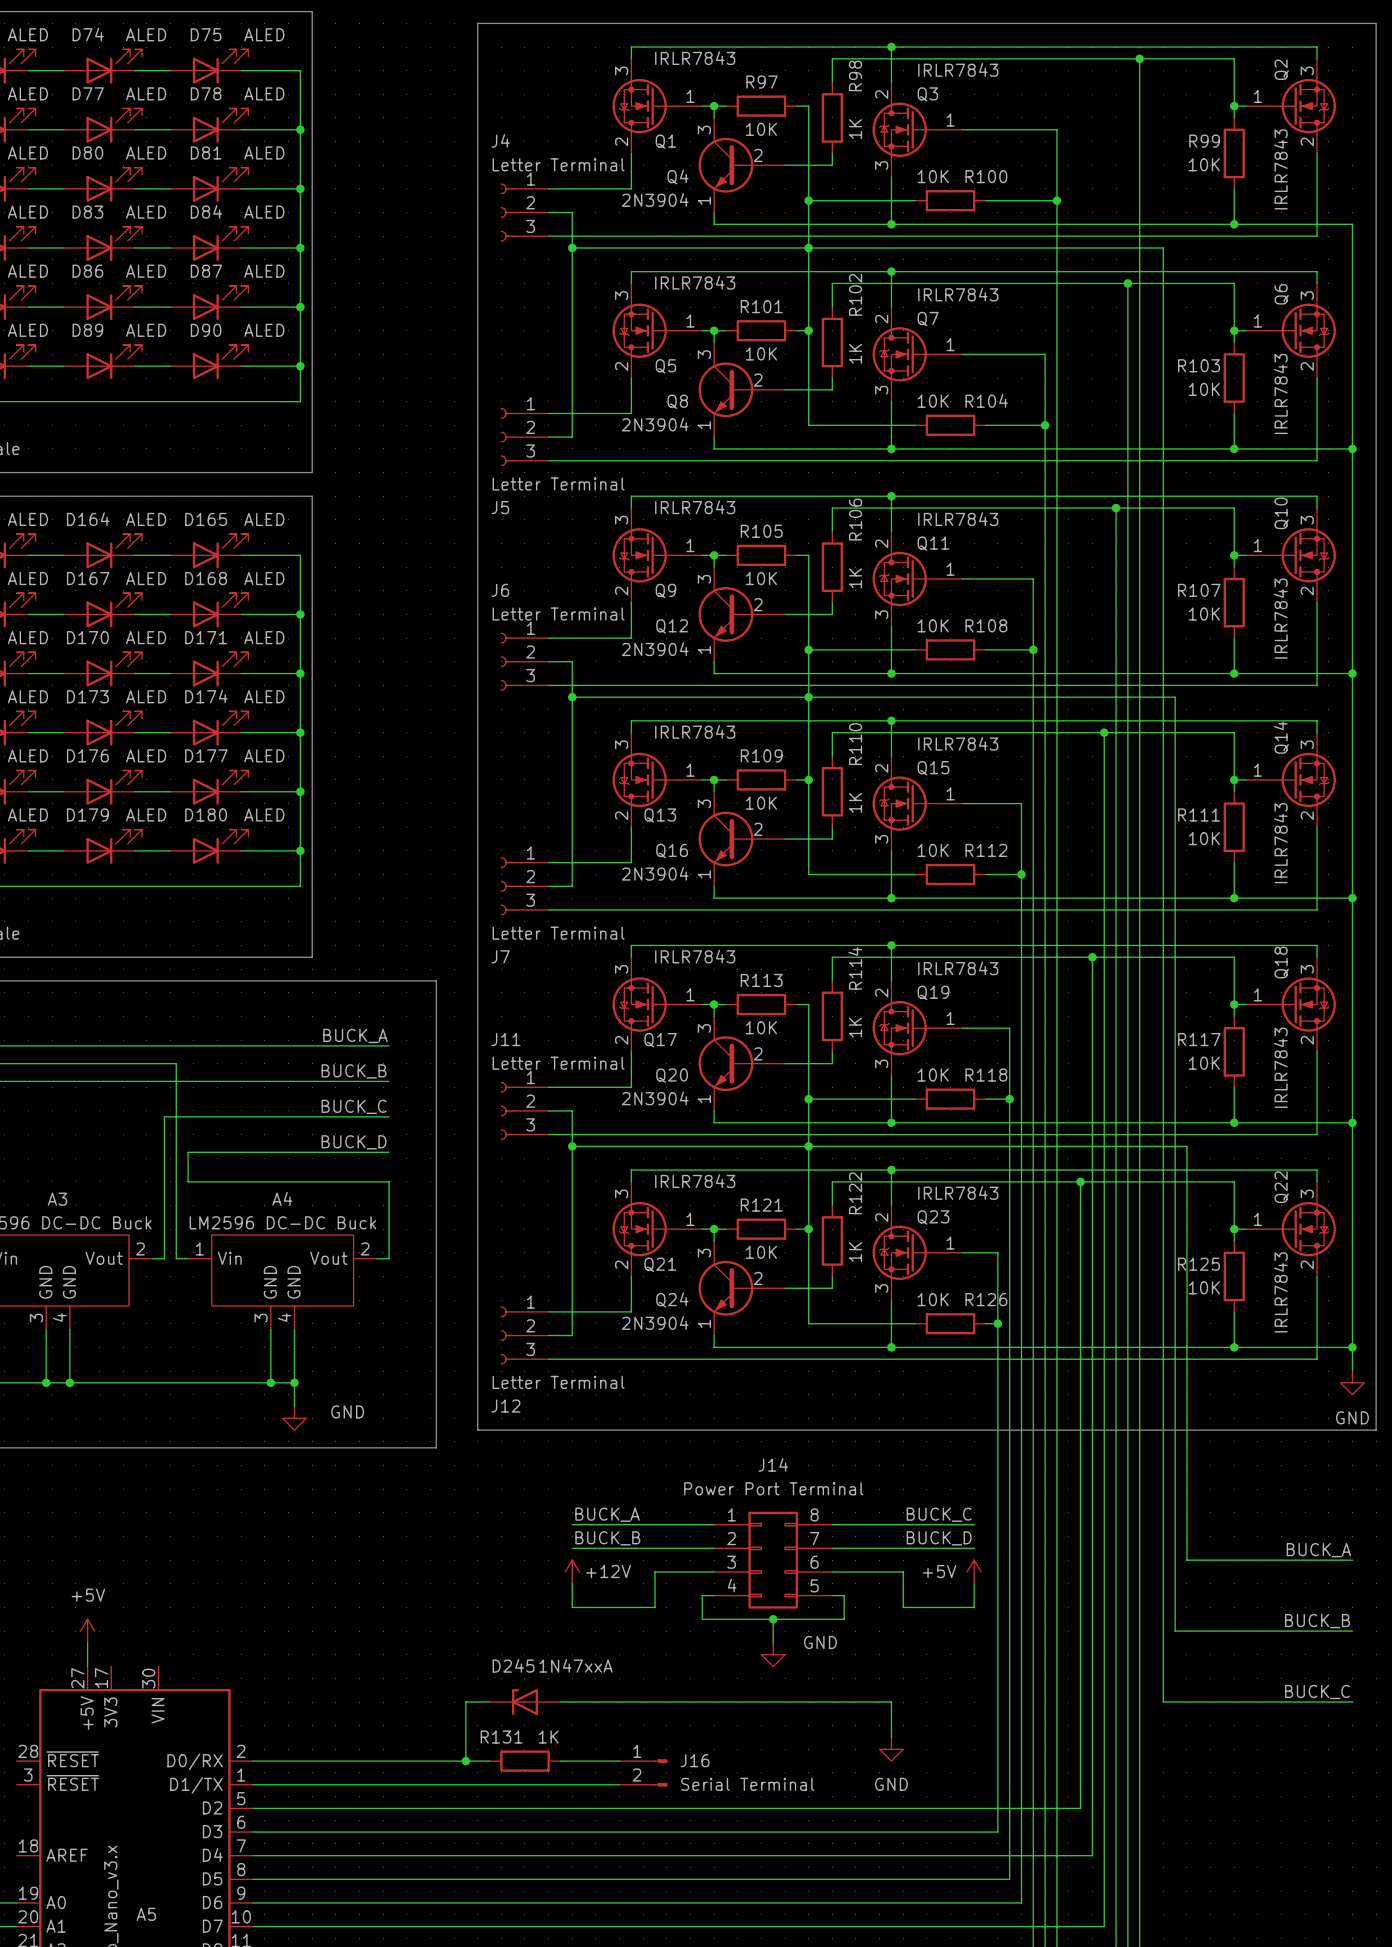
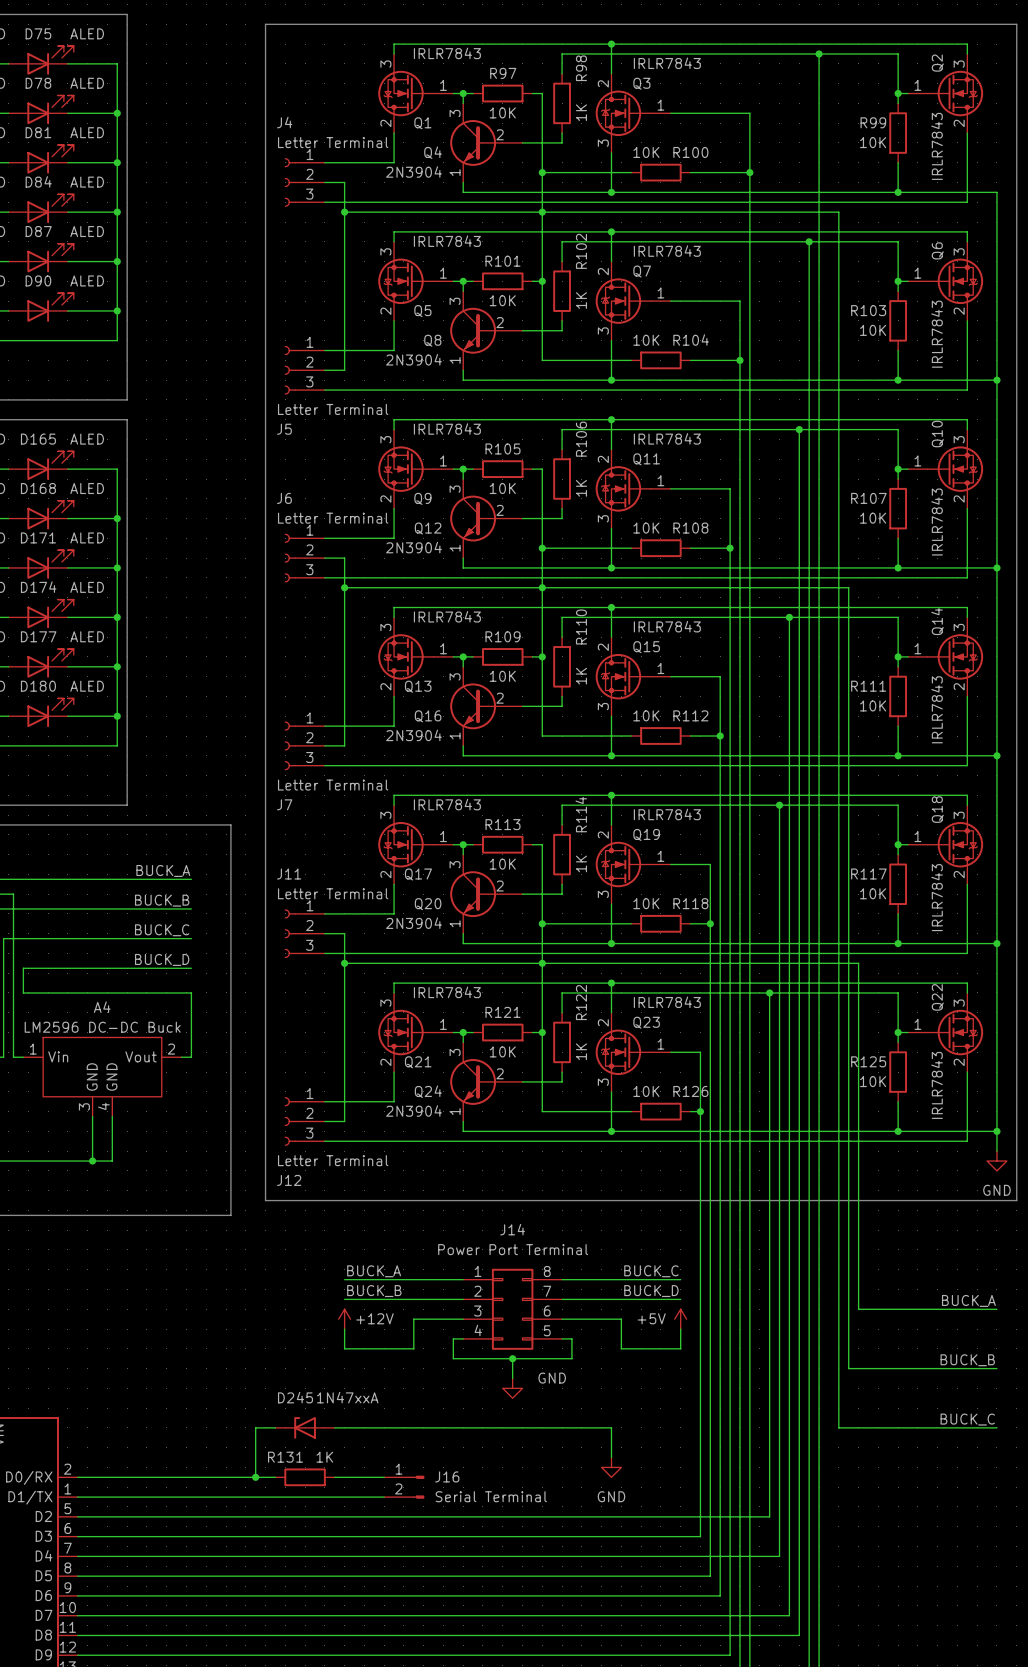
wire: (294, 1382) (294, 1406) -> none
junction: (294, 1382) -> none
power symbol: GND (294, 1418) -> none

